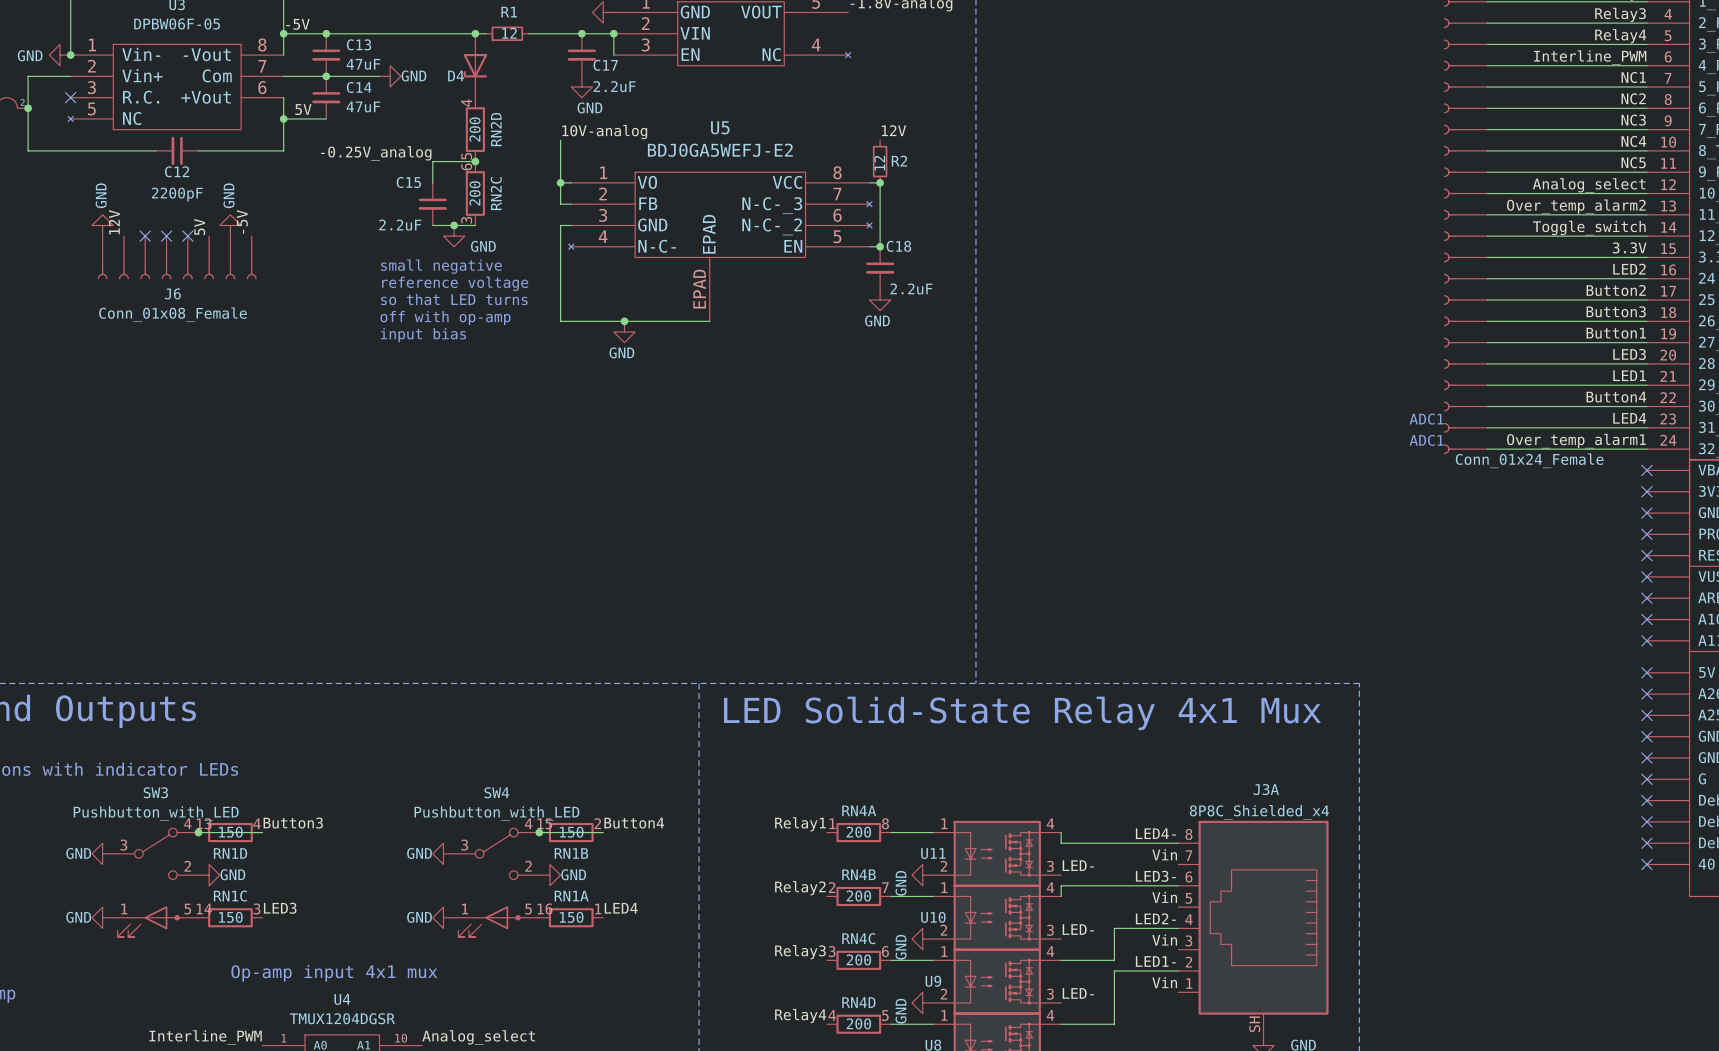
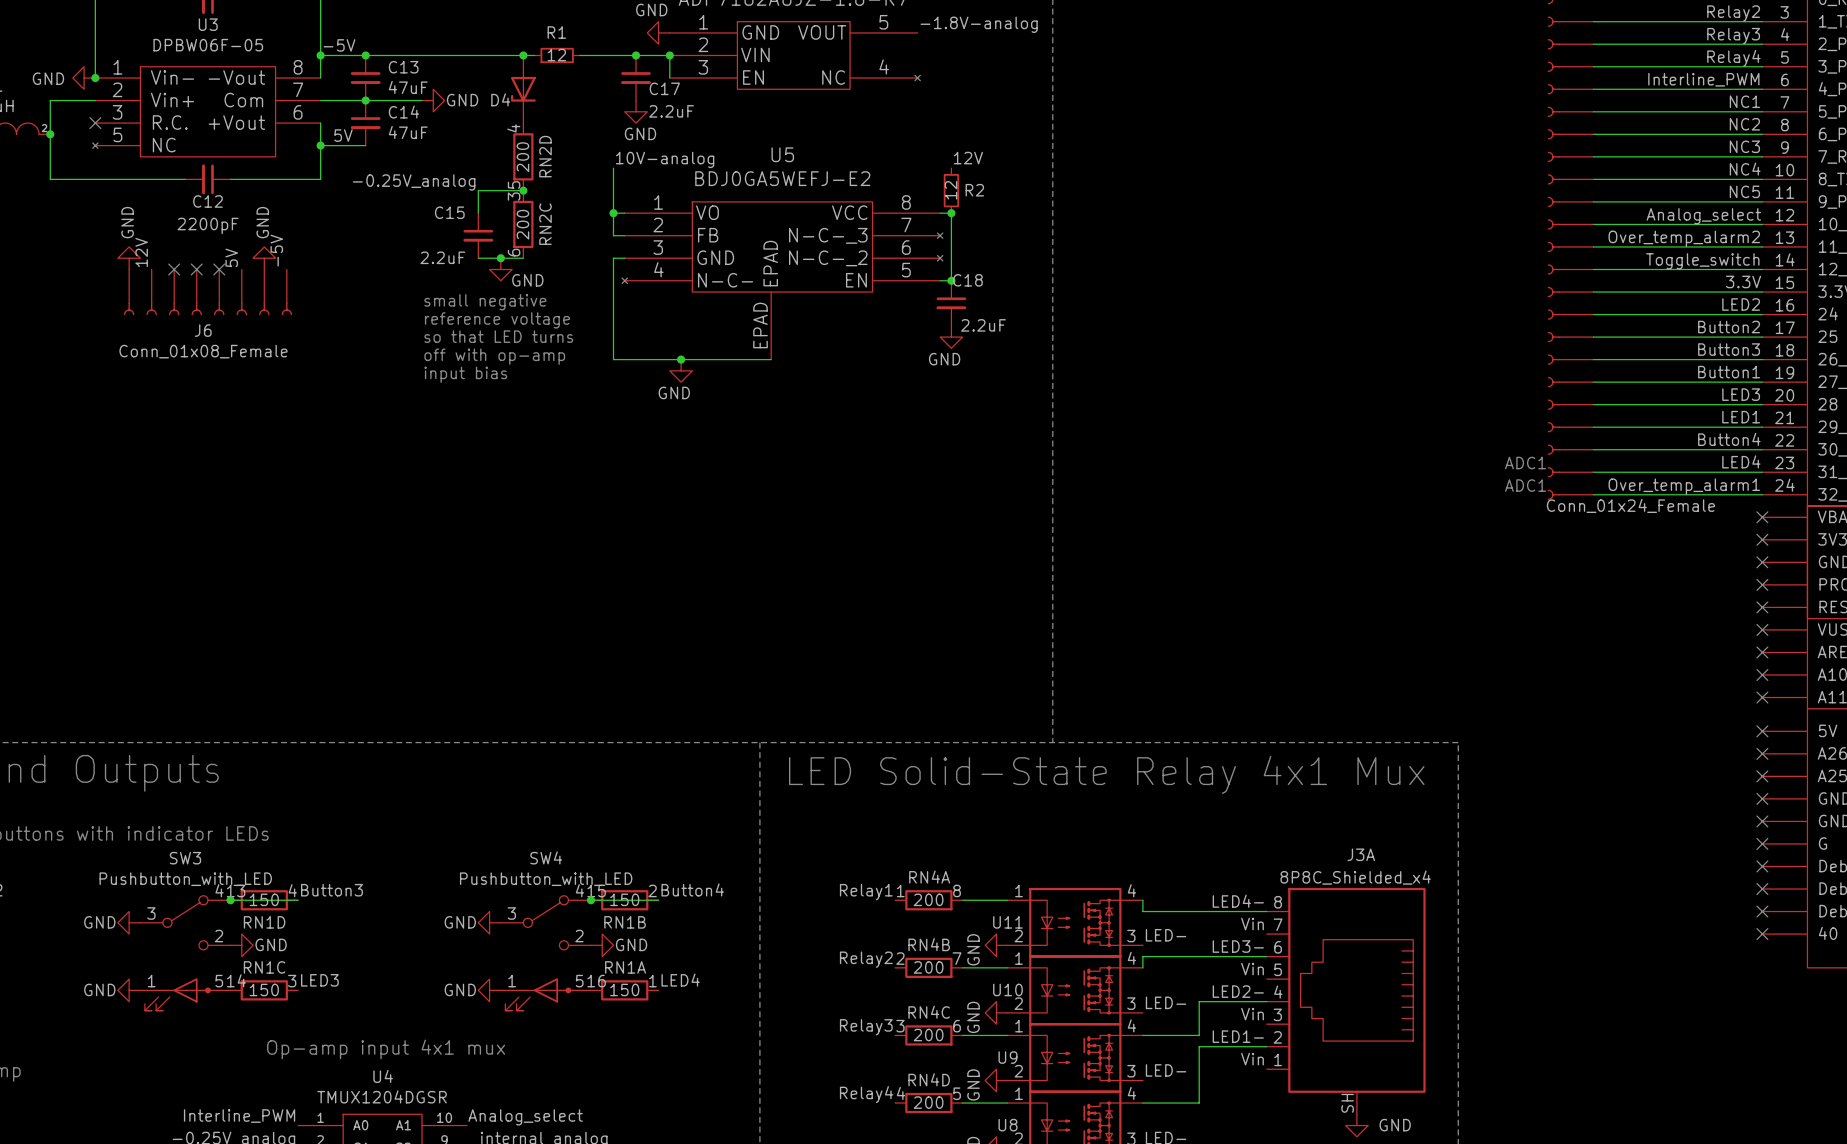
RN2C rotation: 0° (475, 193) -> 180° (523, 224)

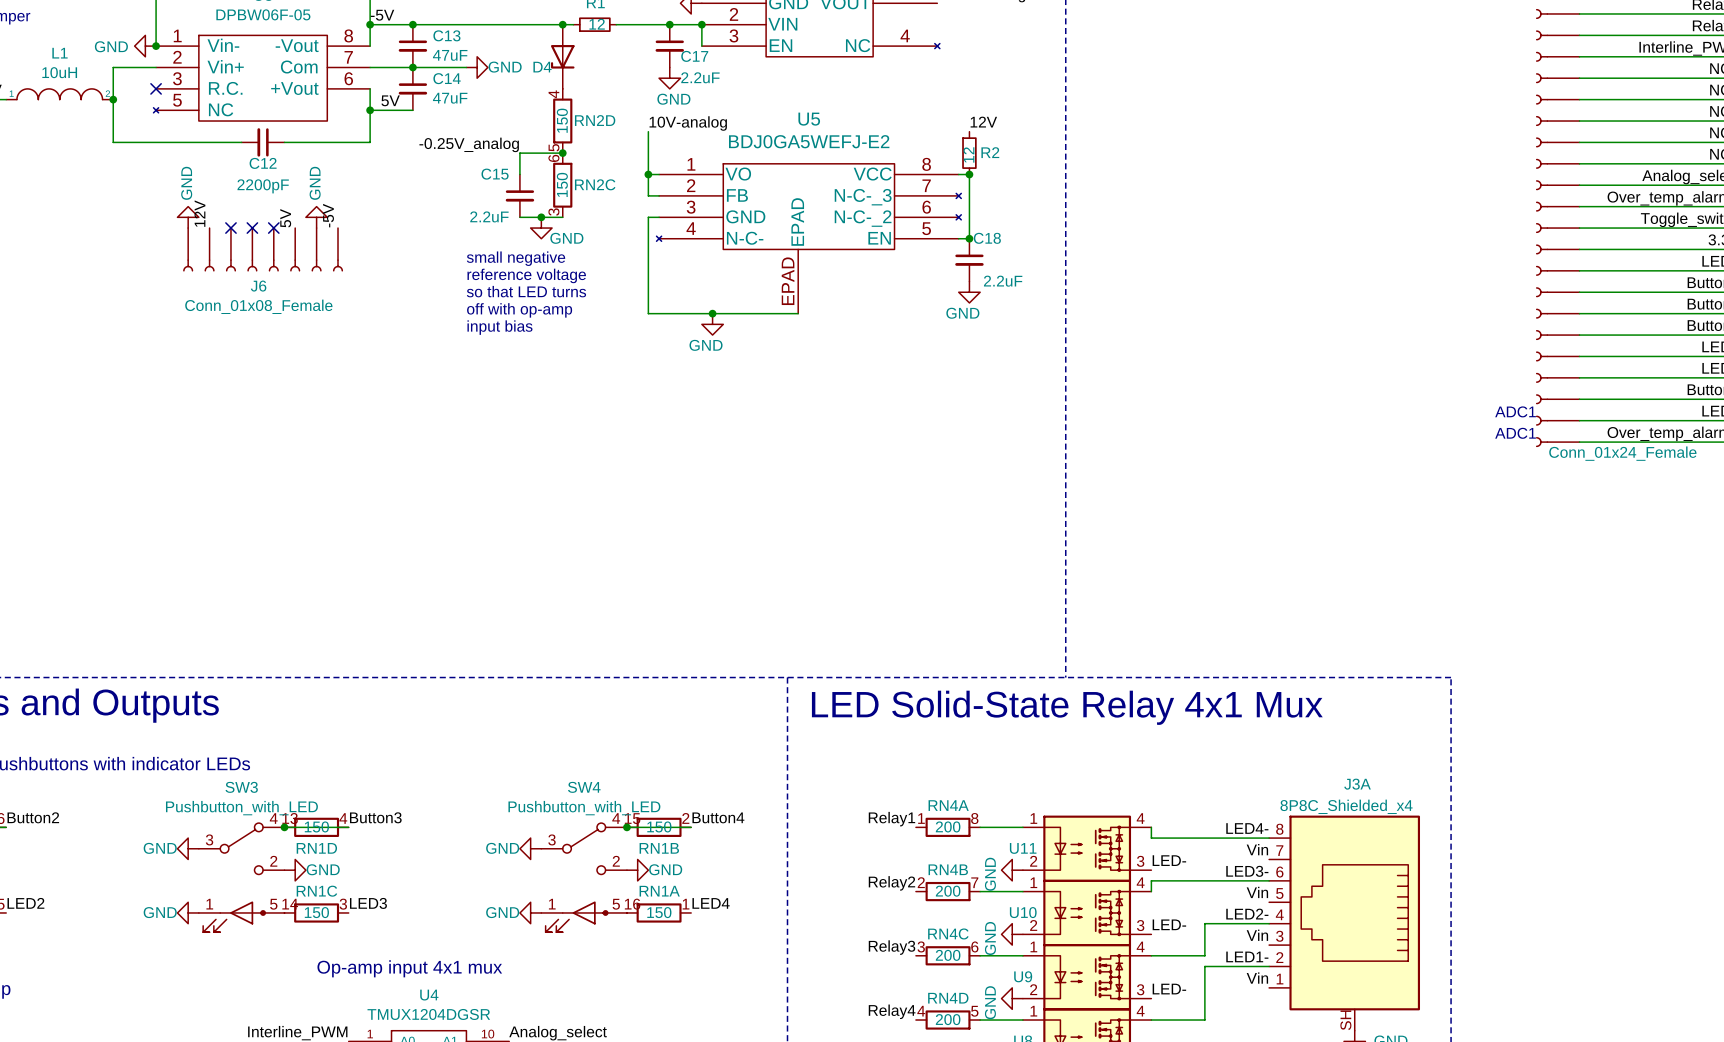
RN2D name rotation: 0° (545, 156) -> 90° clockwise (595, 120)
RN2D value: 200 (522, 157) -> 150 (562, 120)
RN2C value: 200 (522, 224) -> 150 (562, 184)
RN2C rotation: 0° (523, 224) -> 180° (562, 185)

